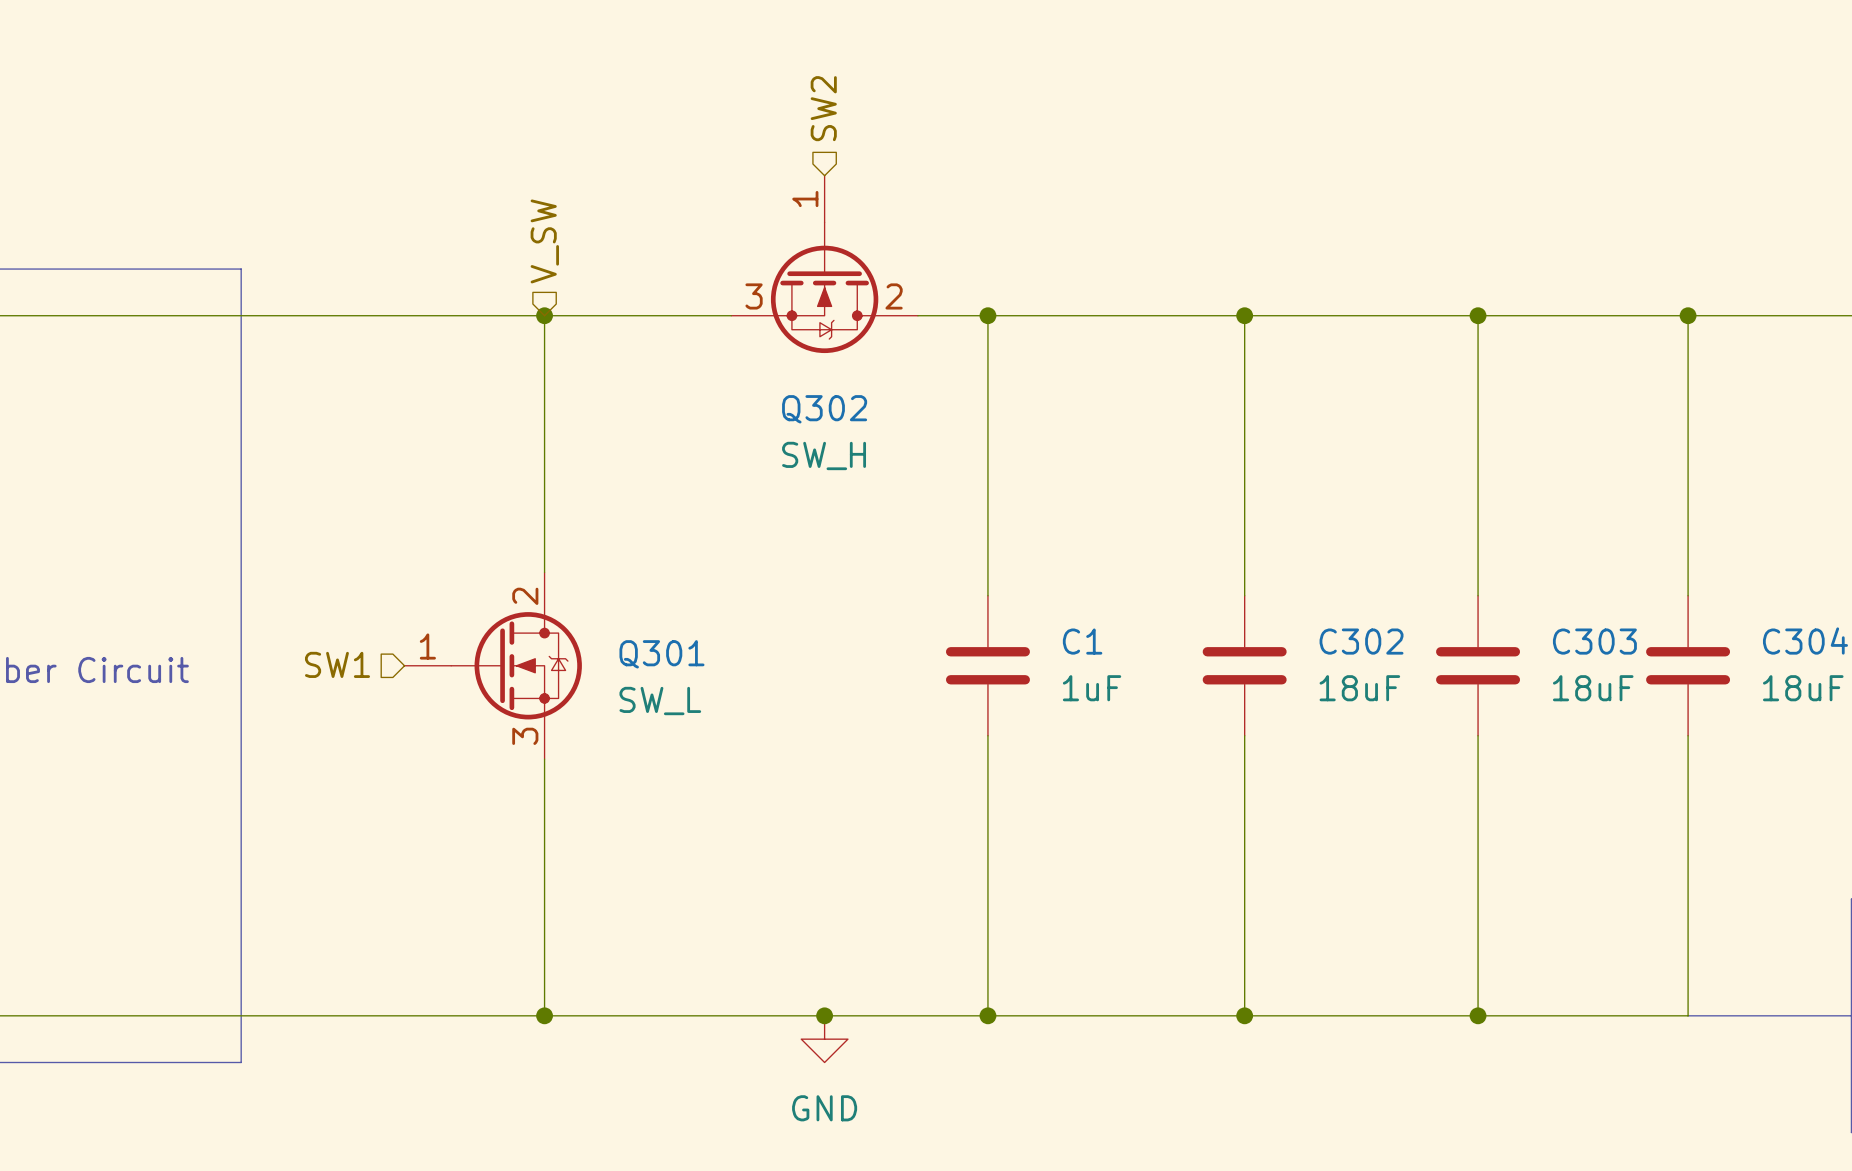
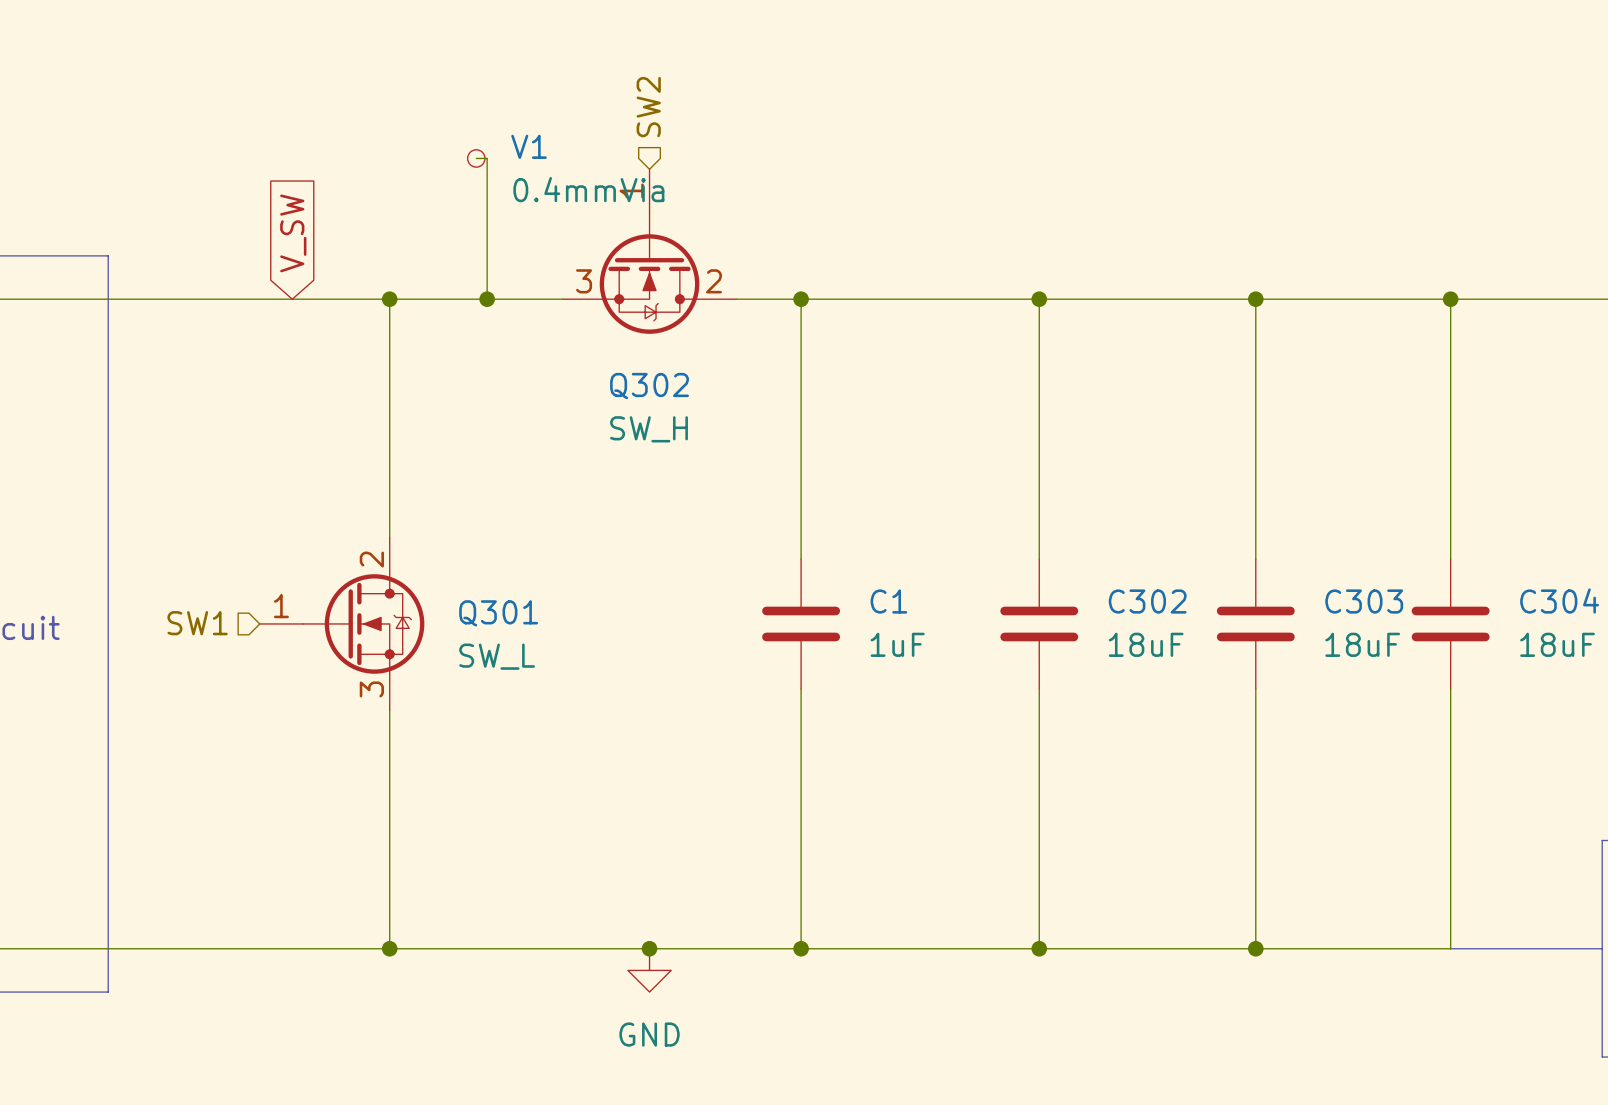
wire: none -> (476, 158) (487, 158) (487, 299)
V1: none -> 0.4mmVia (476, 158)
hierarchical label: V_SW (544, 241) -> none
global label: none -> V_SW (293, 233)
junction: none -> (487, 299)

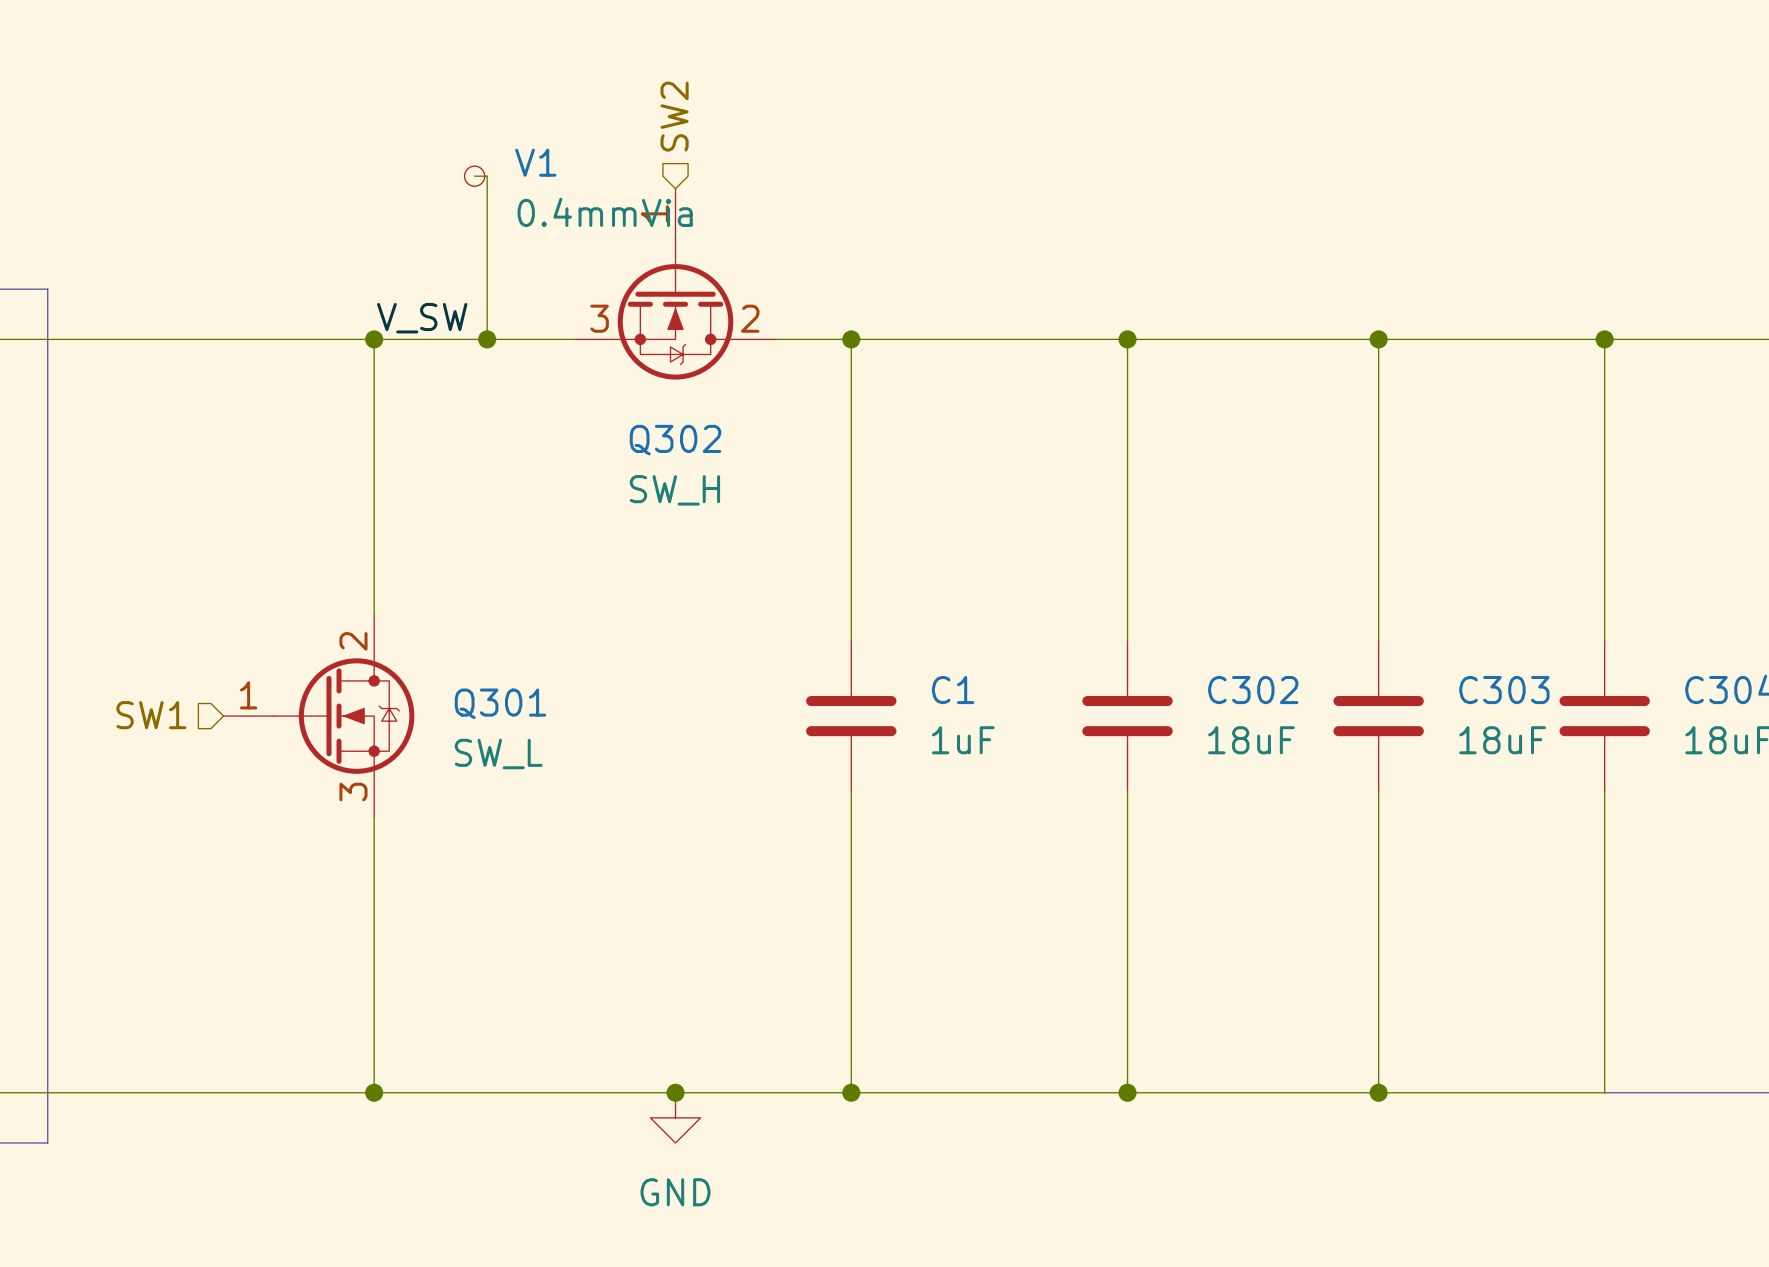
global label: V_SW (293, 233) -> none
label: none -> V_SW (422, 318)

